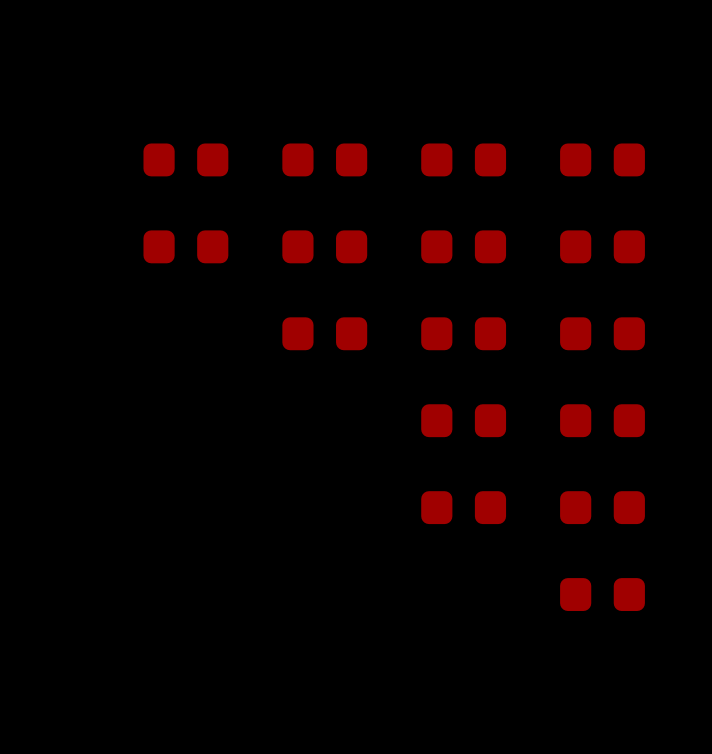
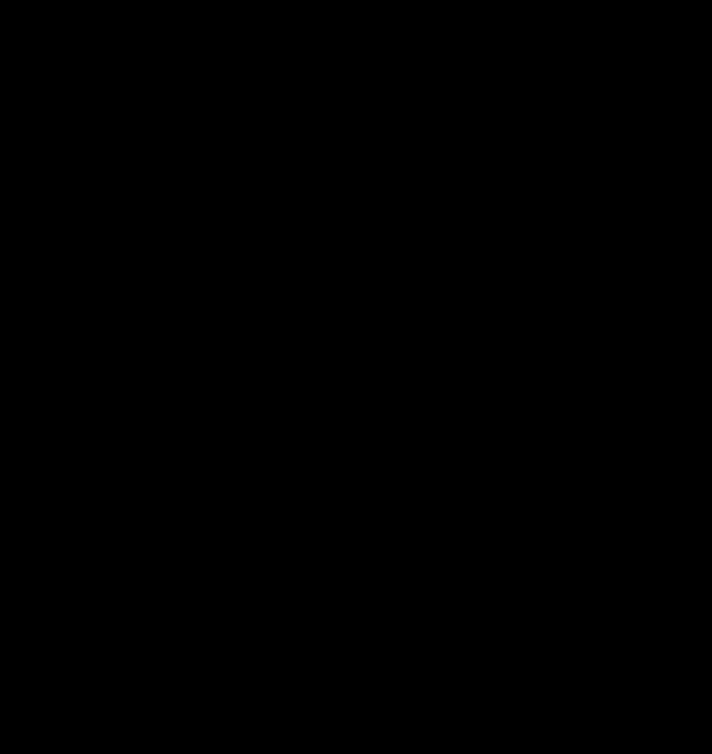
part: (185, 159) -> none
part: (324, 159) -> none
part: (463, 159) -> none
part: (602, 159) -> none
part: (185, 246) -> none
part: (324, 246) -> none
part: (463, 246) -> none
part: (602, 246) -> none
part: (324, 333) -> none
part: (463, 333) -> none
part: (602, 333) -> none
part: (463, 420) -> none
part: (602, 420) -> none
part: (463, 507) -> none
part: (602, 507) -> none
part: (602, 594) -> none

